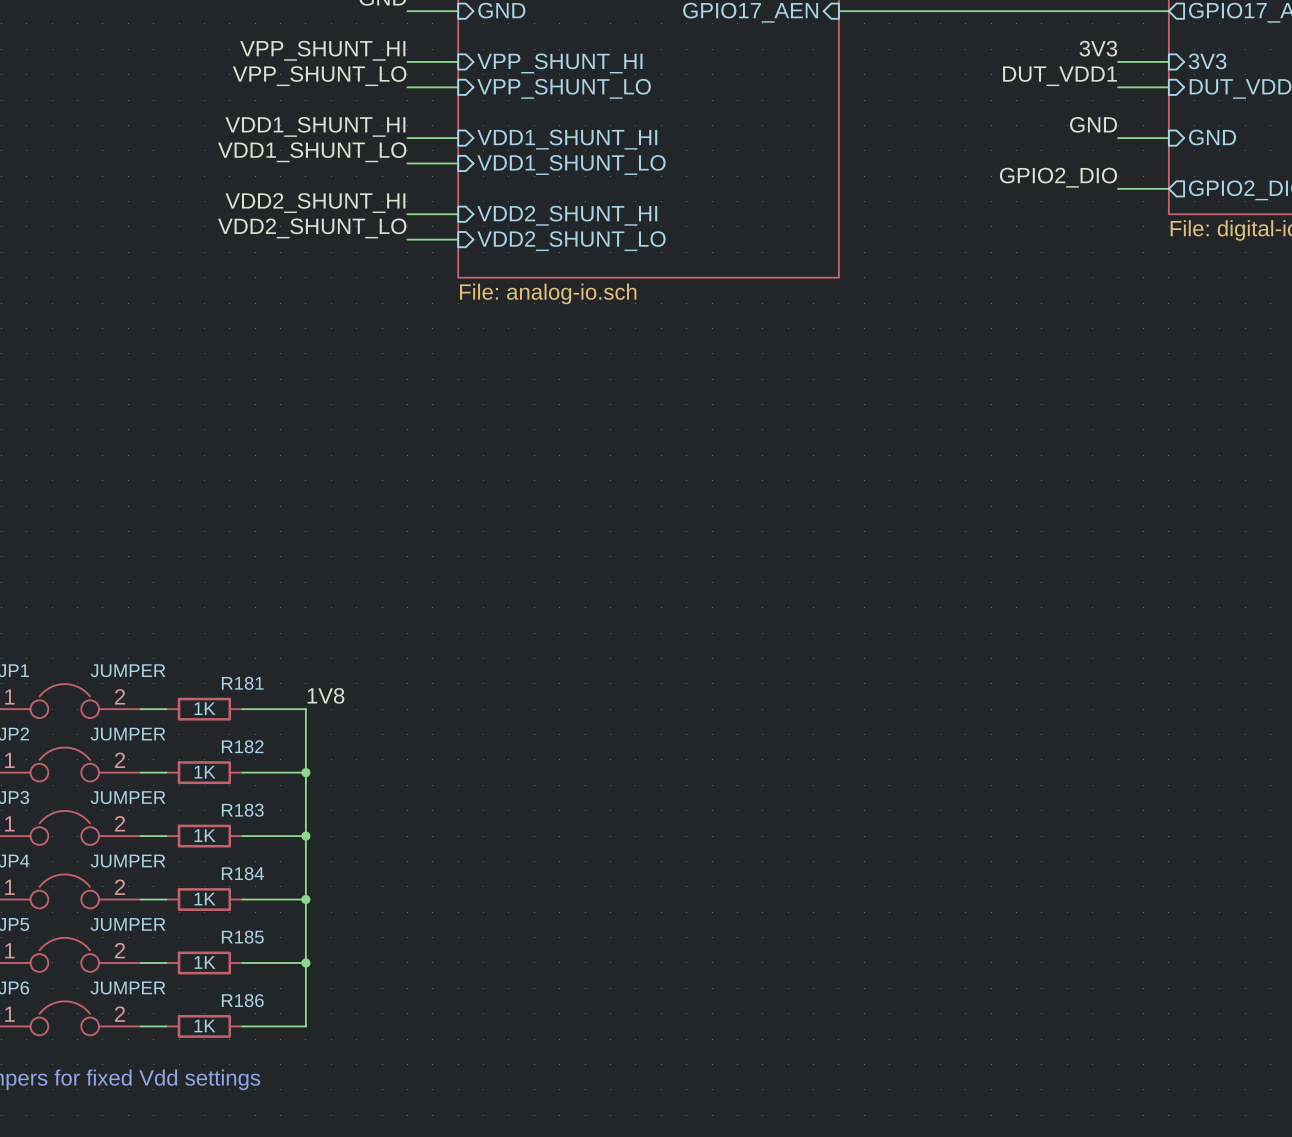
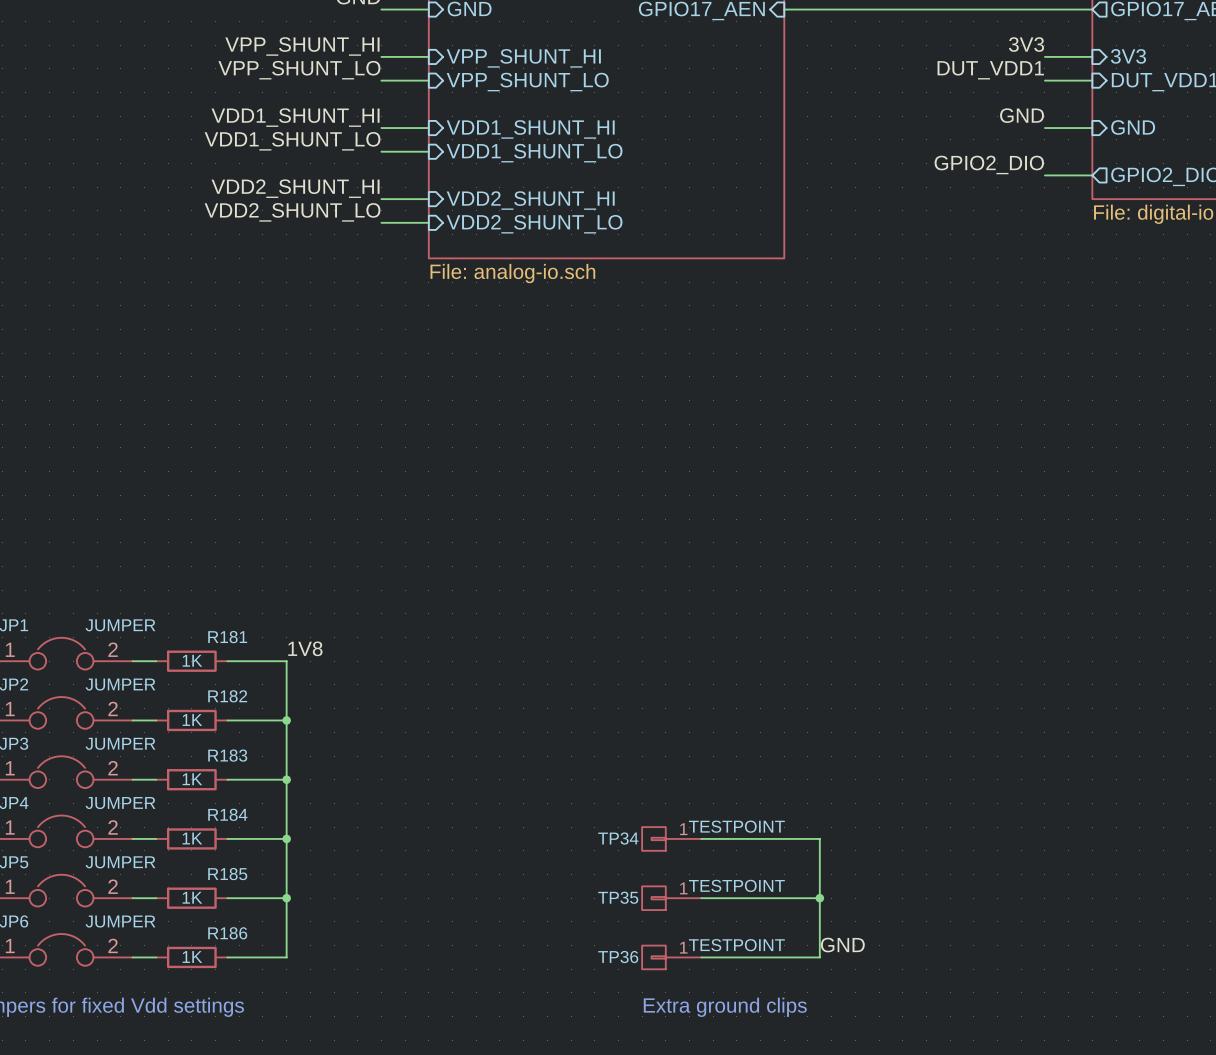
TP34: none -> TESTPOINT (671, 838)
wire: none -> (701, 838) (819, 838) (819, 957) (701, 957)
TP35: none -> TESTPOINT (671, 898)
wire: none -> (701, 898) (819, 898)
junction: none -> (819, 898)
label: none -> GND (842, 945)
TP36: none -> TESTPOINT (671, 957)
text: none -> Extra ground clips (725, 1007)

